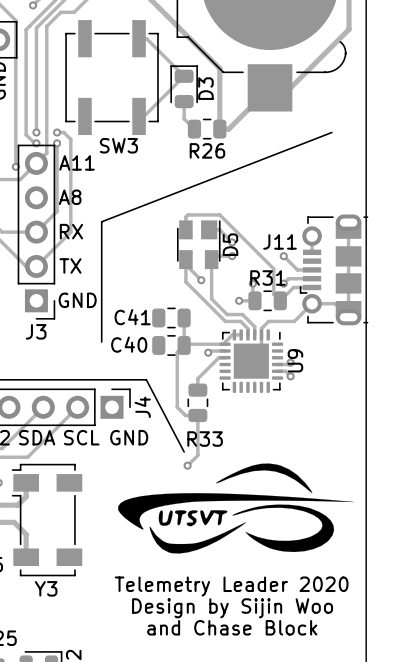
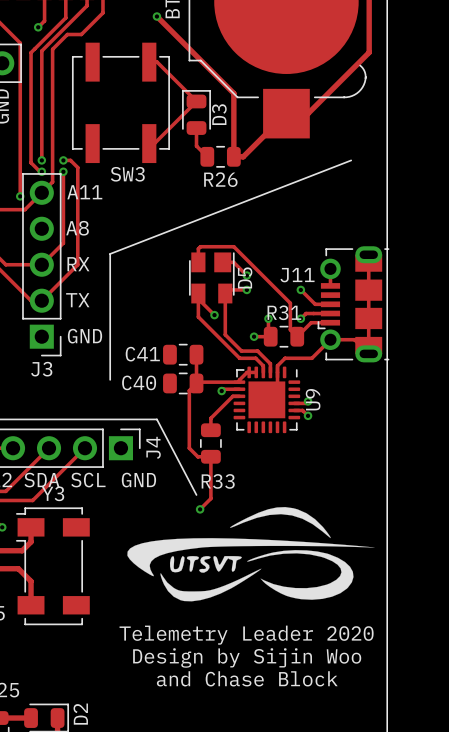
Y3 name position: Y3 (46, 588) -> Y3 (53, 493)

